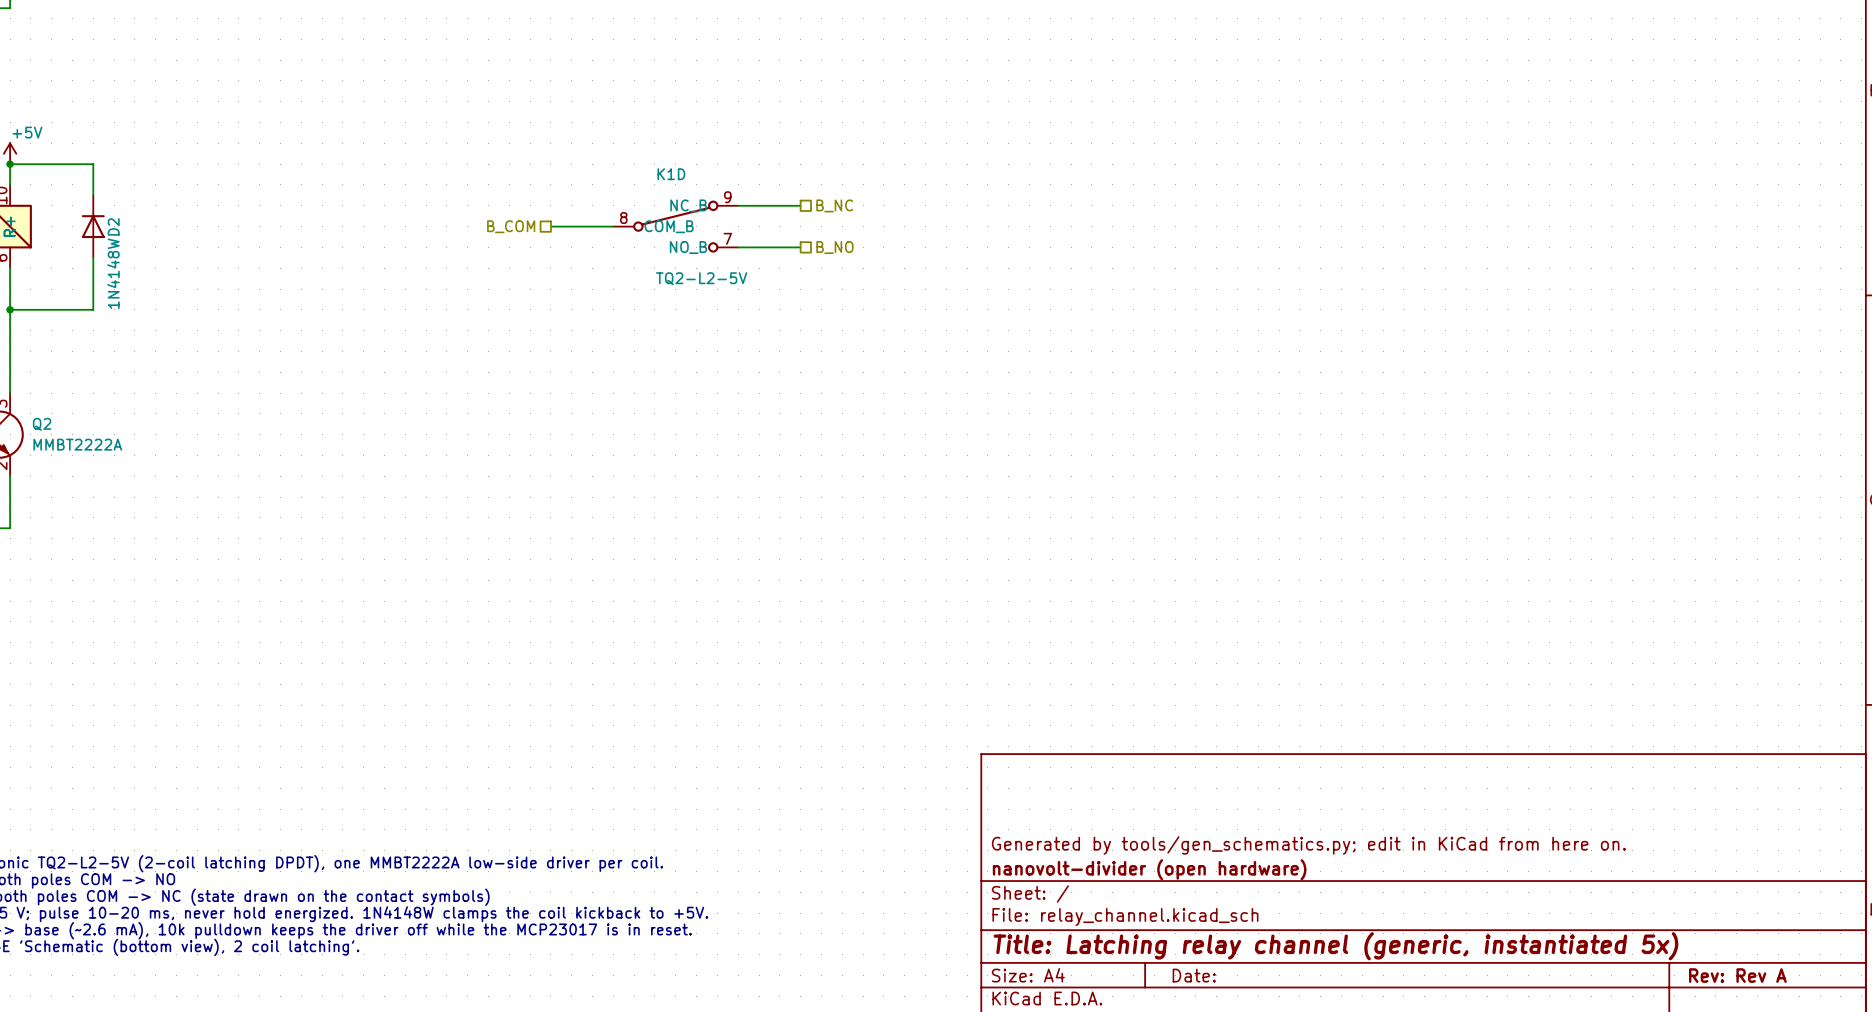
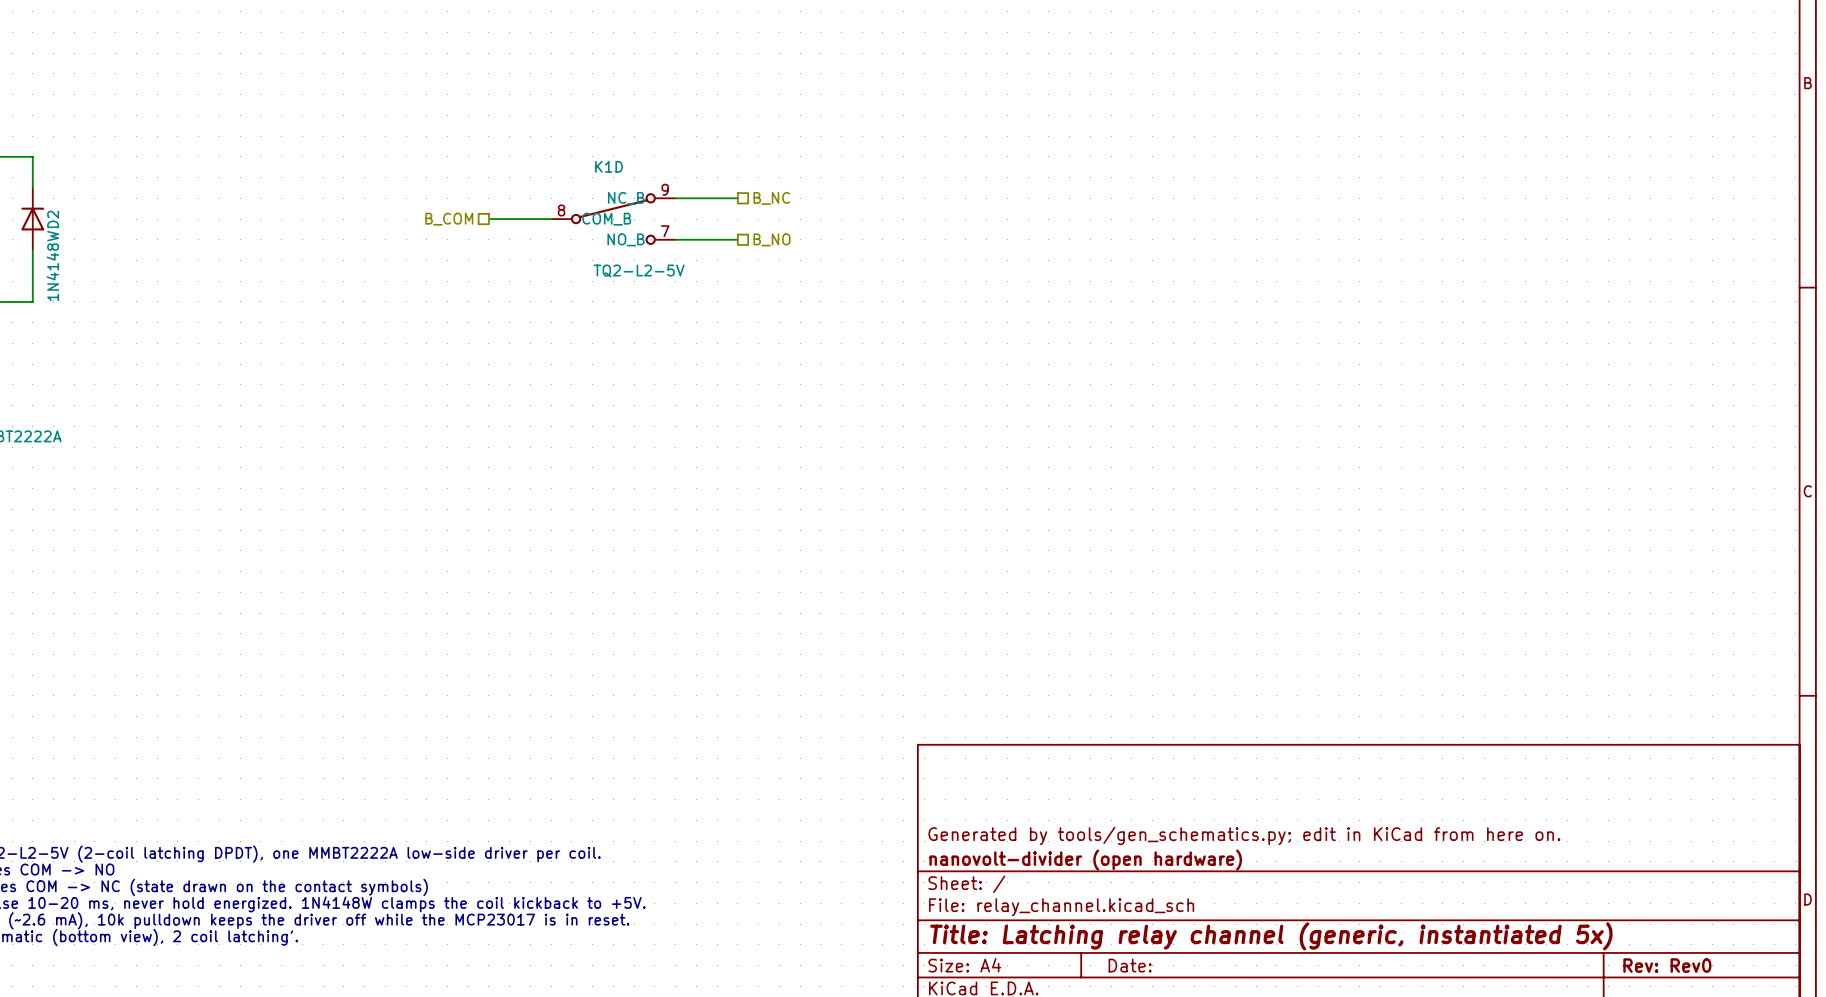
title block: Rev: Rev A (1737, 975) -> Rev: Rev0 (1667, 965)

